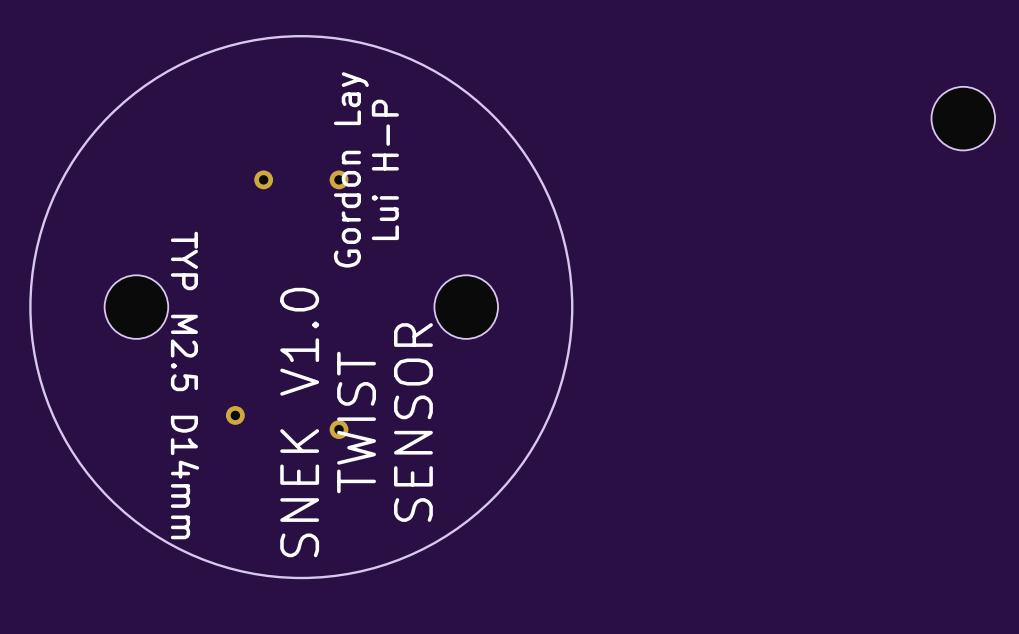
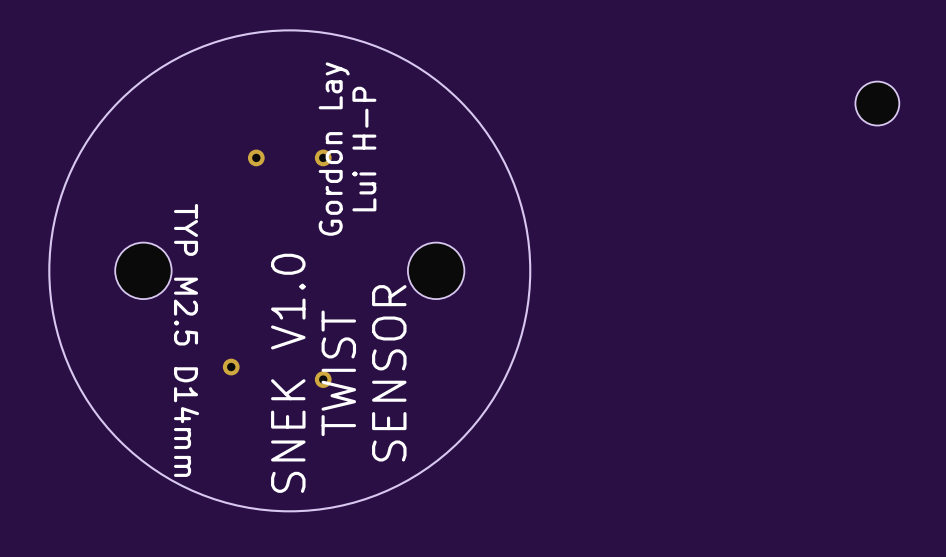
part footprint: [931, 86, 996, 151] -> [855, 81, 900, 126]

